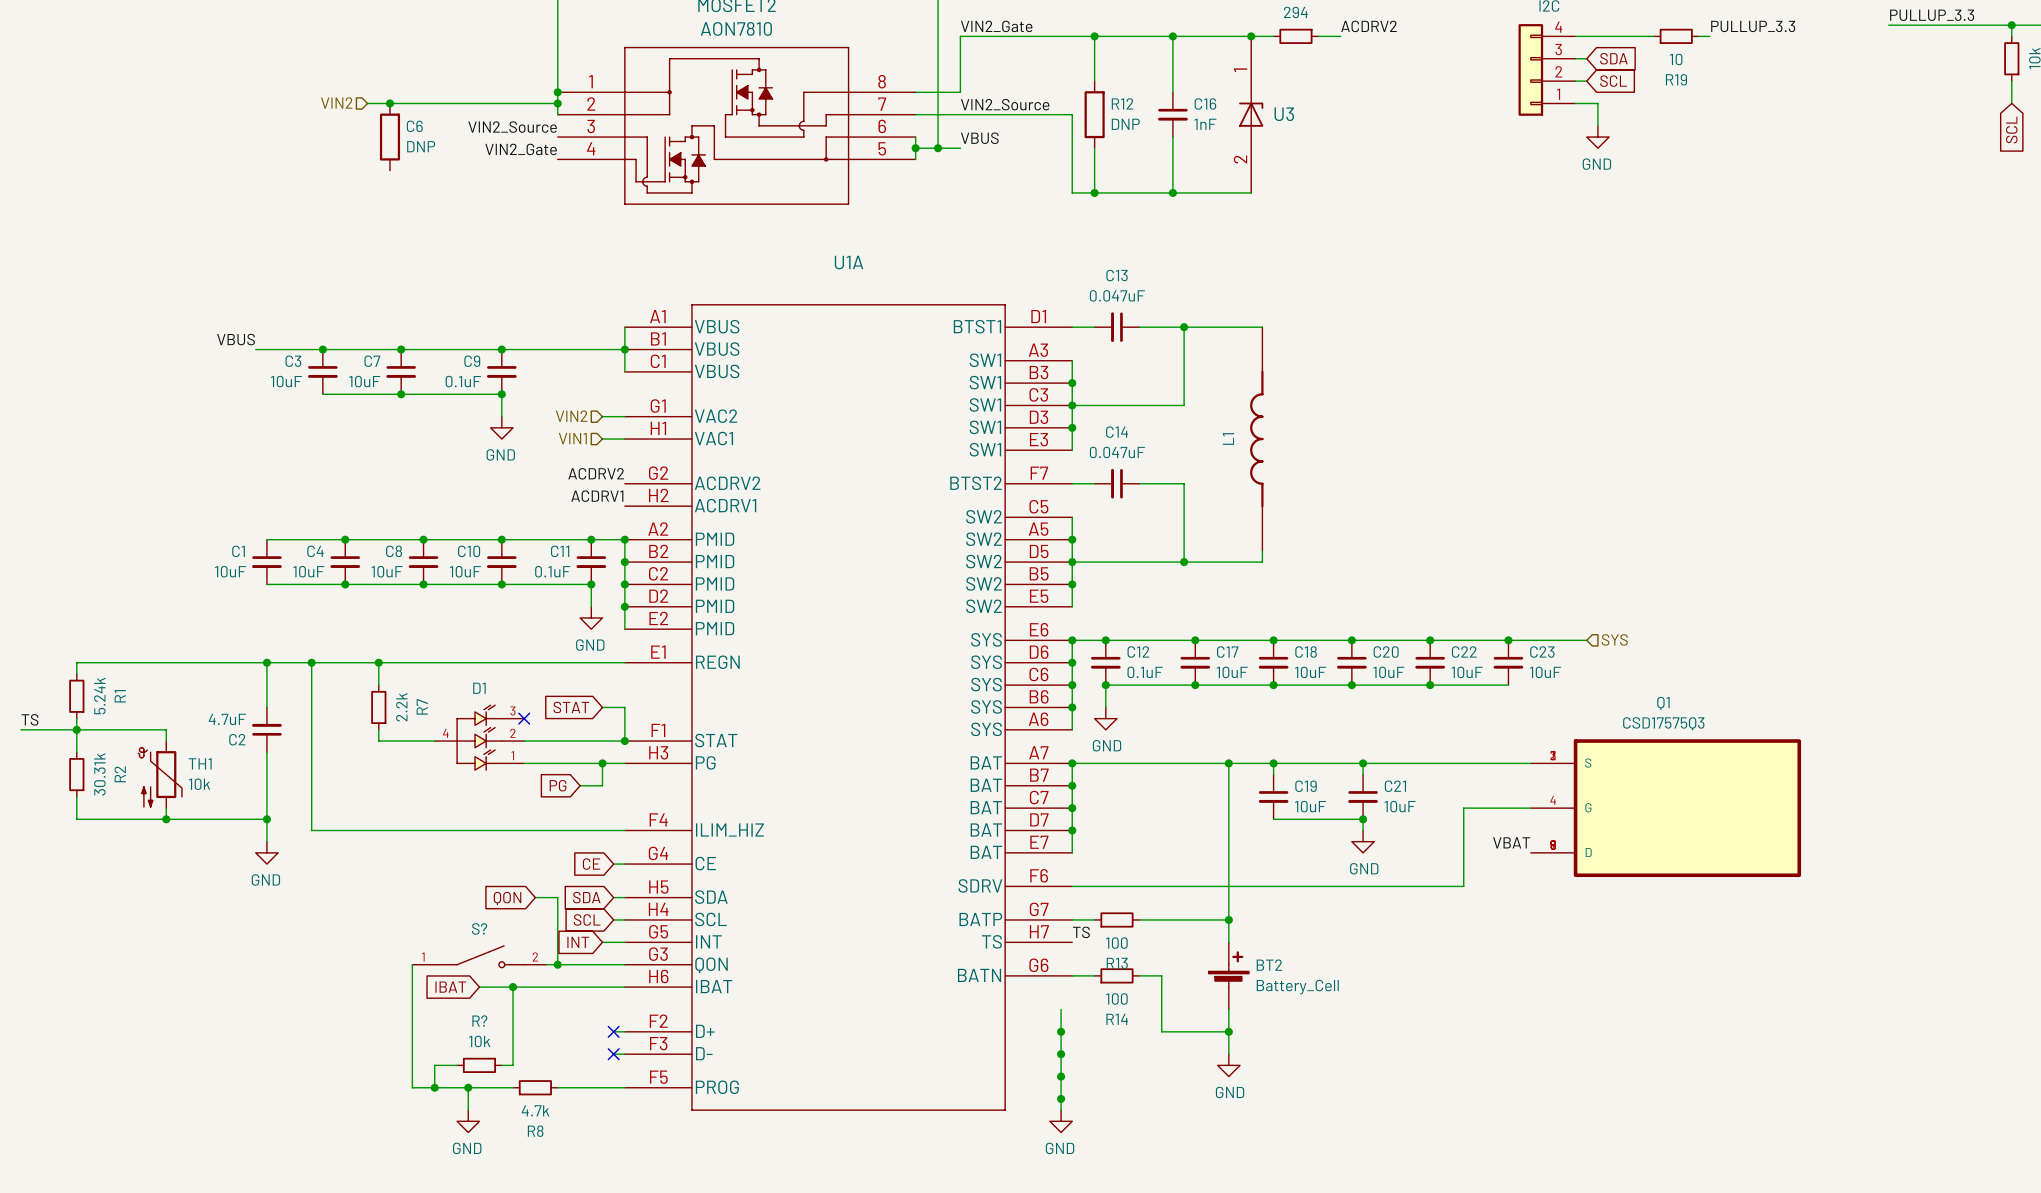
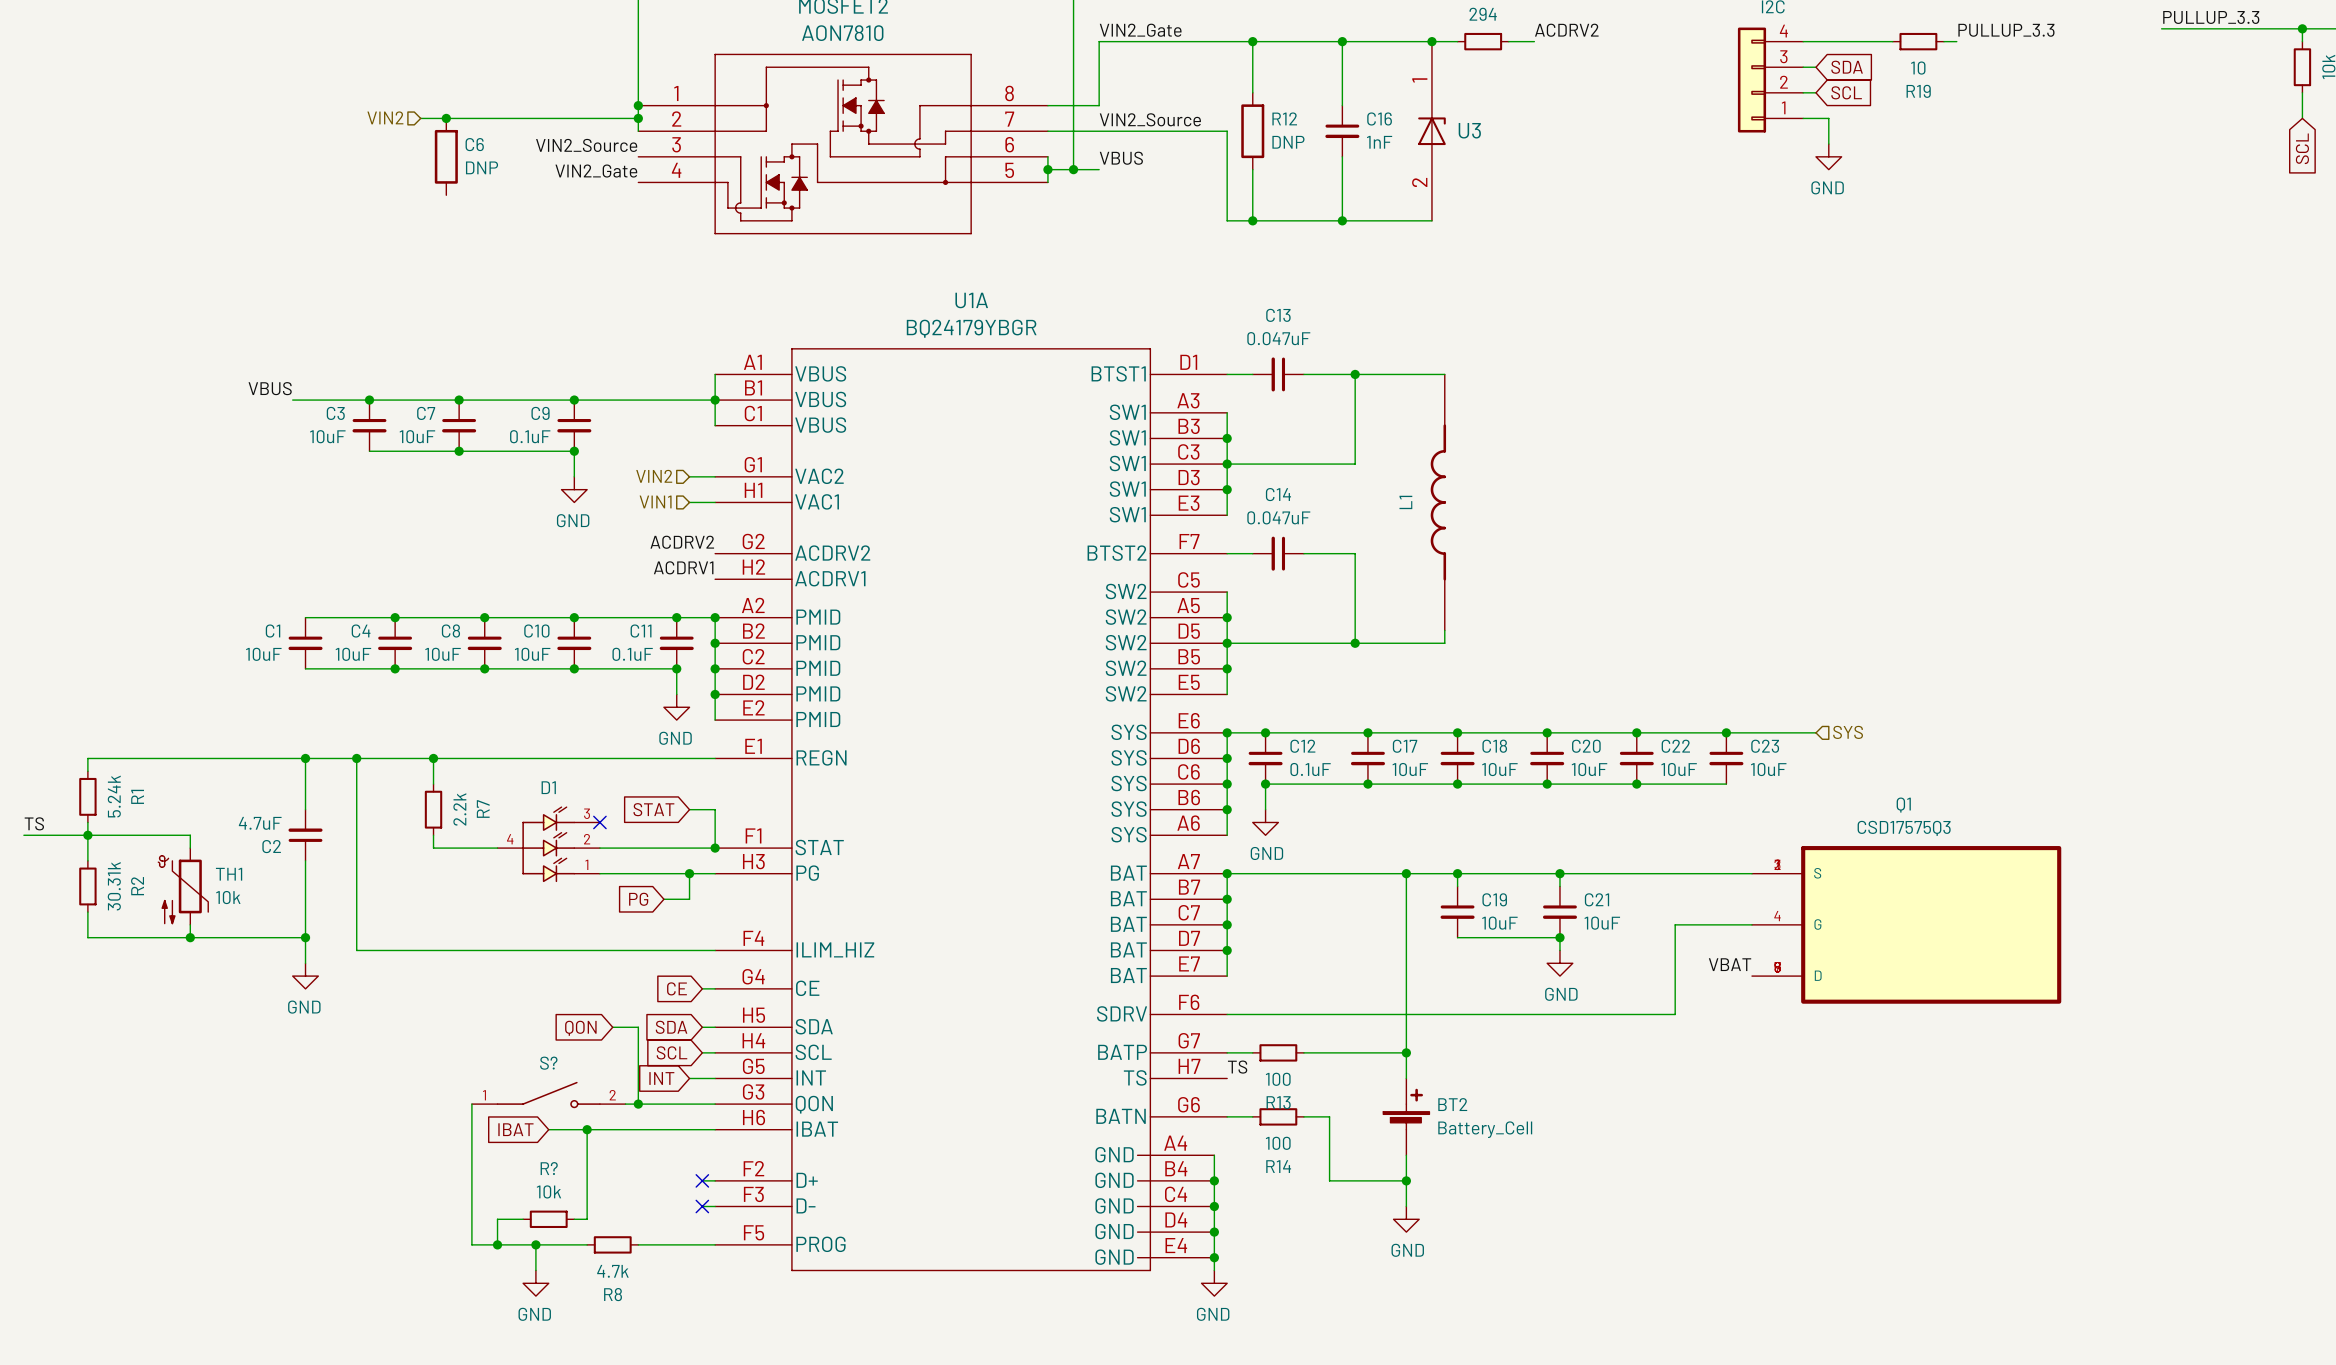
U1A value: none -> BQ24179YBGR (971, 328)
U1A symbol: [624, 304, 1073, 1111] -> [715, 348, 1228, 1272]

